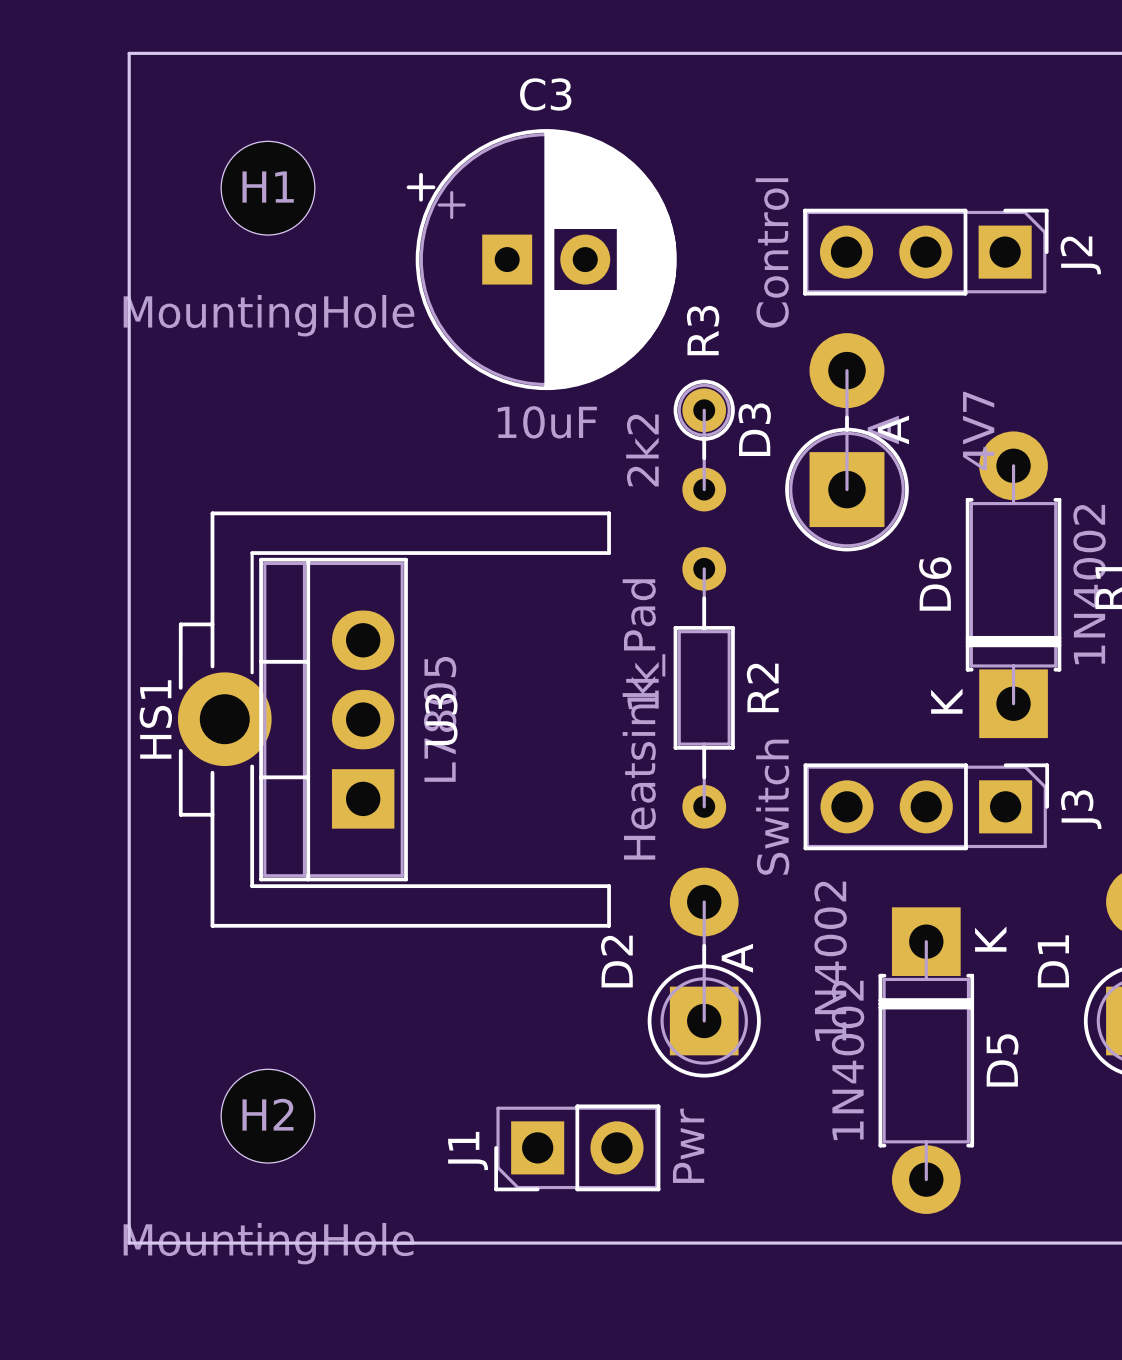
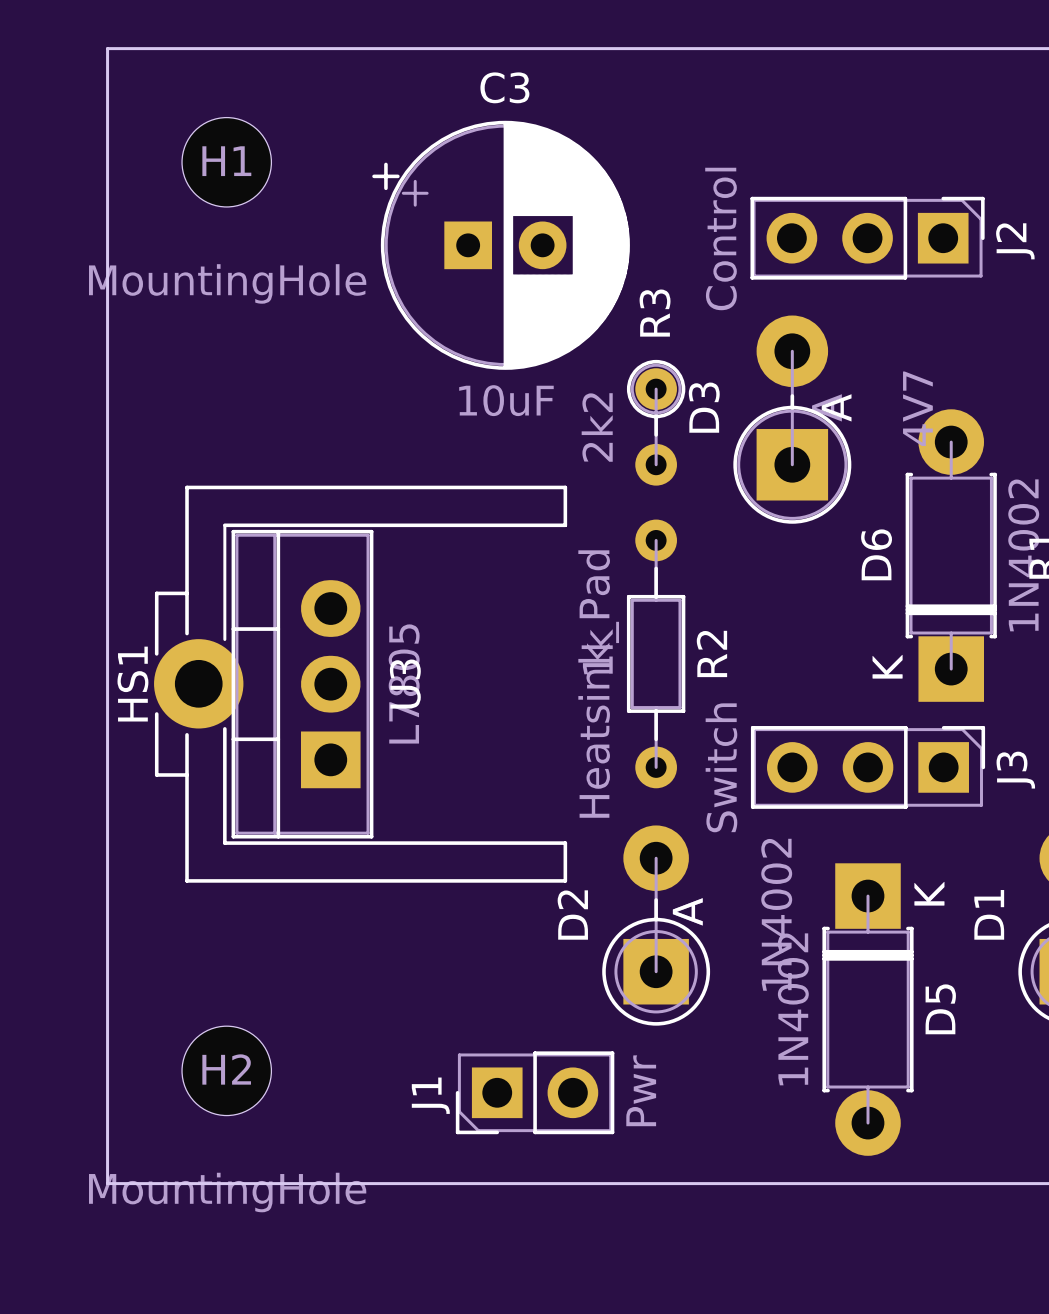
H1 position: (268, 188) -> (226, 162)
H2 position: (268, 1116) -> (226, 1070)

